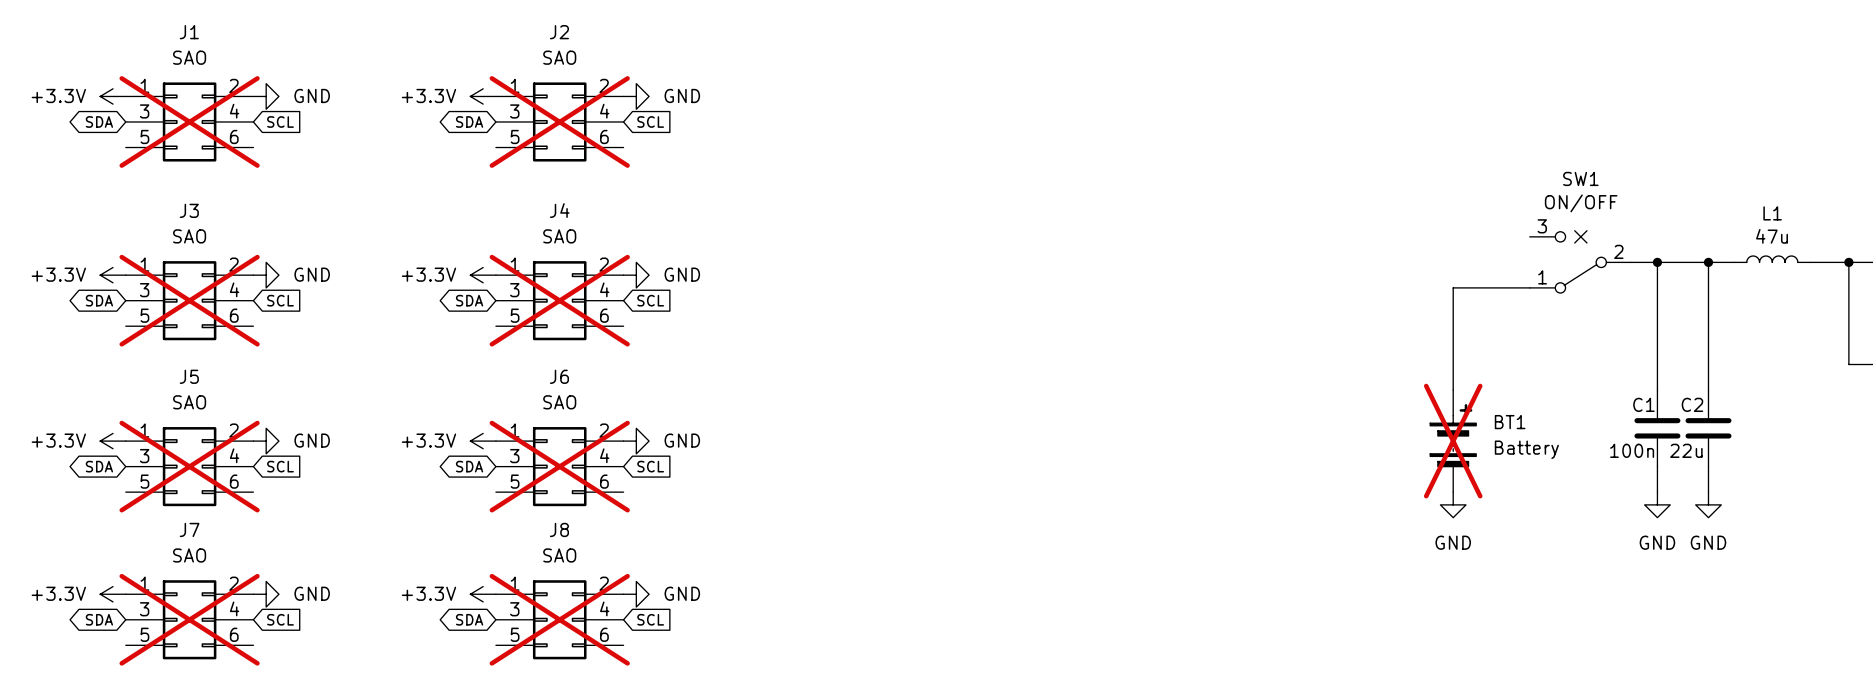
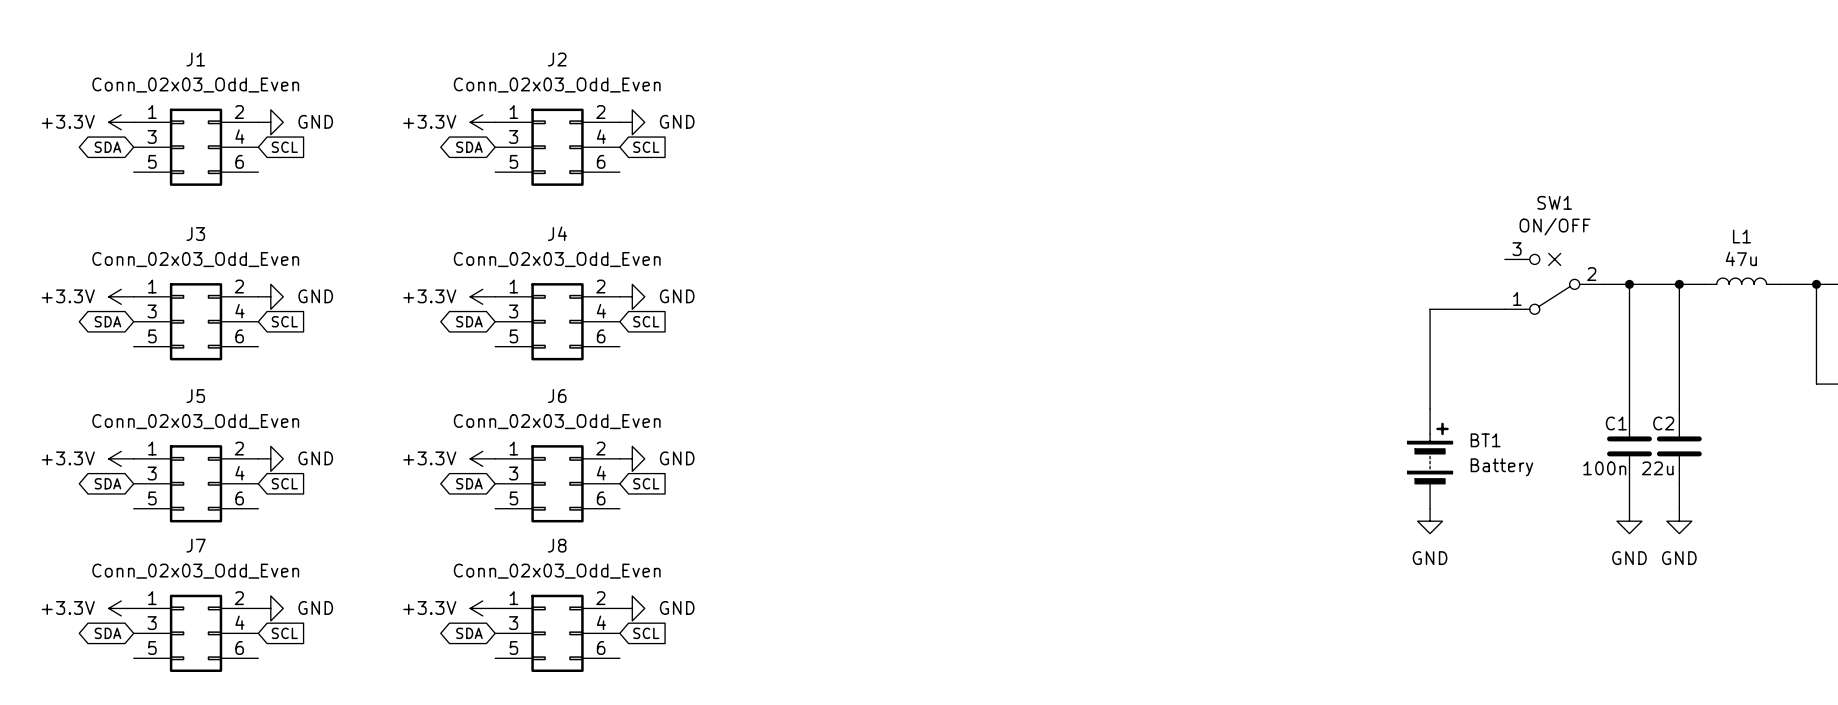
J1 value: SAO (189, 57) -> Conn_02x03_Odd_Even (195, 85)
J2 value: SAO (559, 57) -> Conn_02x03_Odd_Even (557, 85)
J1 do-not-place cross: (189, 121) -> none
J2 do-not-place cross: (559, 121) -> none
J3 value: SAO (189, 236) -> Conn_02x03_Odd_Even (195, 259)
J4 value: SAO (559, 236) -> Conn_02x03_Odd_Even (557, 259)
J3 do-not-place cross: (189, 300) -> none
J4 do-not-place cross: (559, 300) -> none
J5 value: SAO (189, 402) -> Conn_02x03_Odd_Even (195, 421)
J6 value: SAO (559, 402) -> Conn_02x03_Odd_Even (557, 421)
BT1 do-not-place cross: (1453, 441) -> none
J5 do-not-place cross: (189, 466) -> none
J6 do-not-place cross: (559, 466) -> none
J7 value: SAO (189, 555) -> Conn_02x03_Odd_Even (195, 571)
J8 value: SAO (559, 555) -> Conn_02x03_Odd_Even (557, 571)
J7 do-not-place cross: (189, 619) -> none
J8 do-not-place cross: (559, 619) -> none

